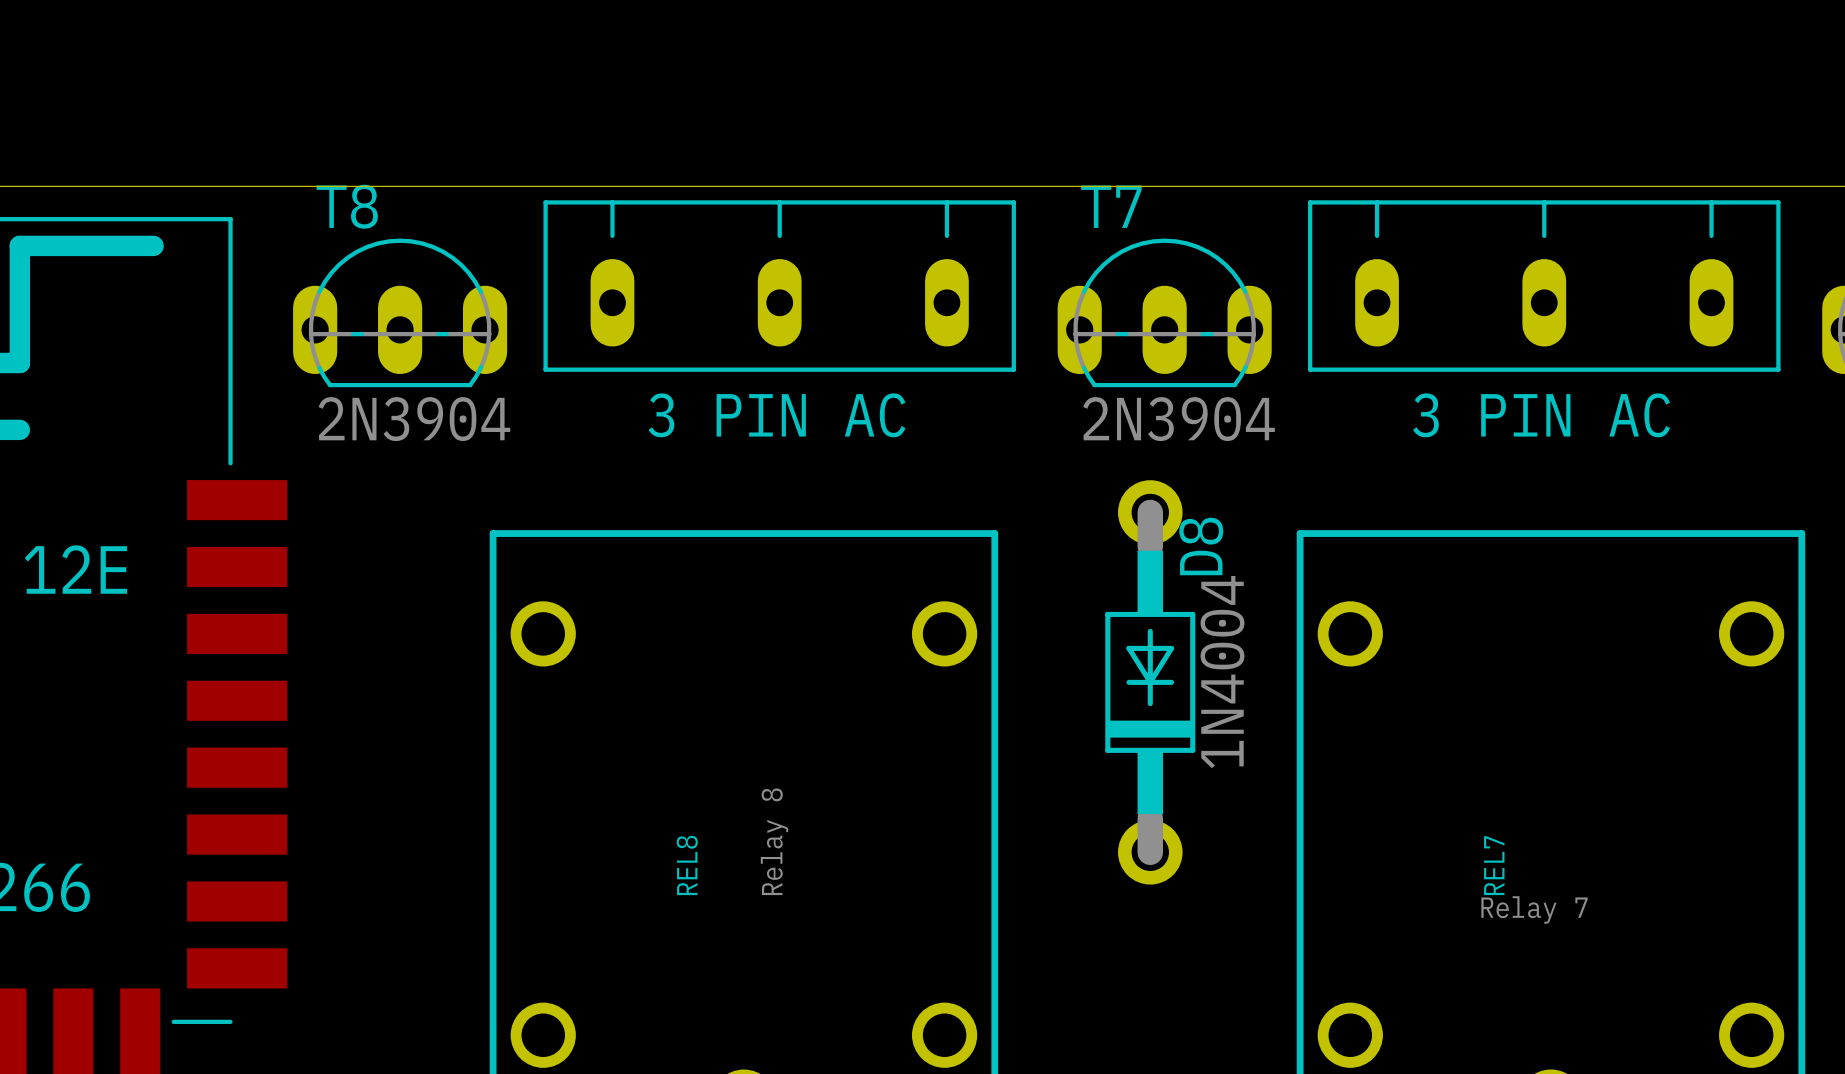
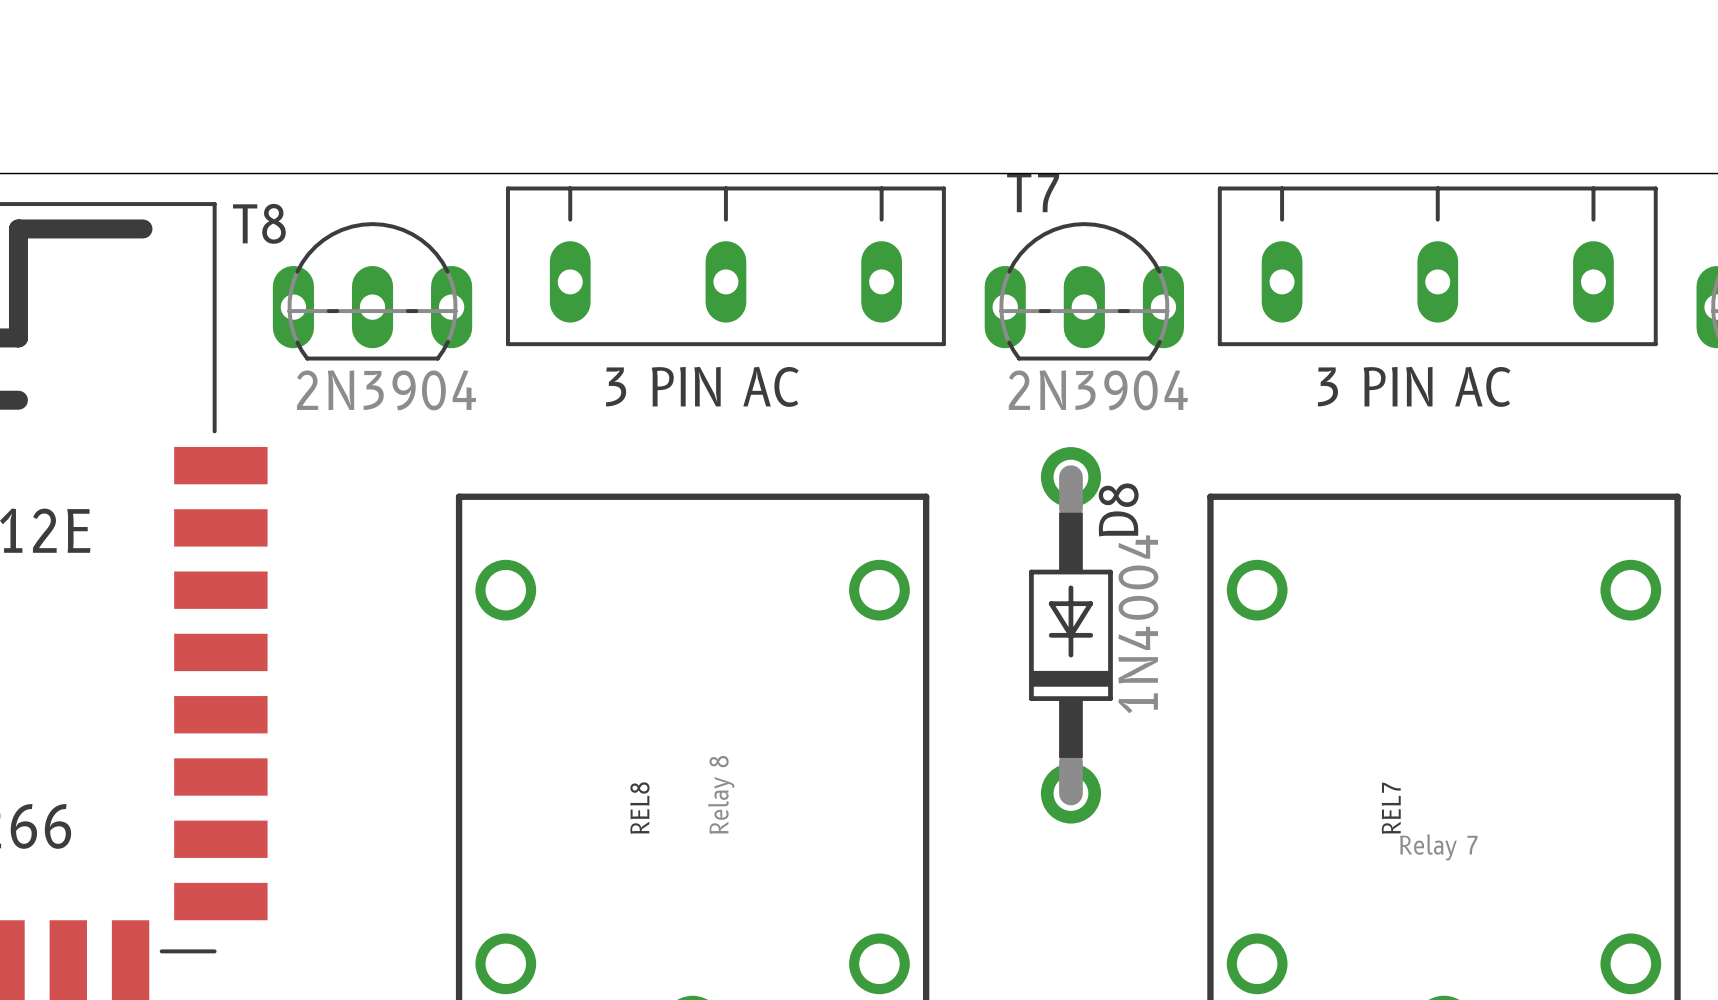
T8 name position: T8 (347, 206) -> T8 (259, 223)

